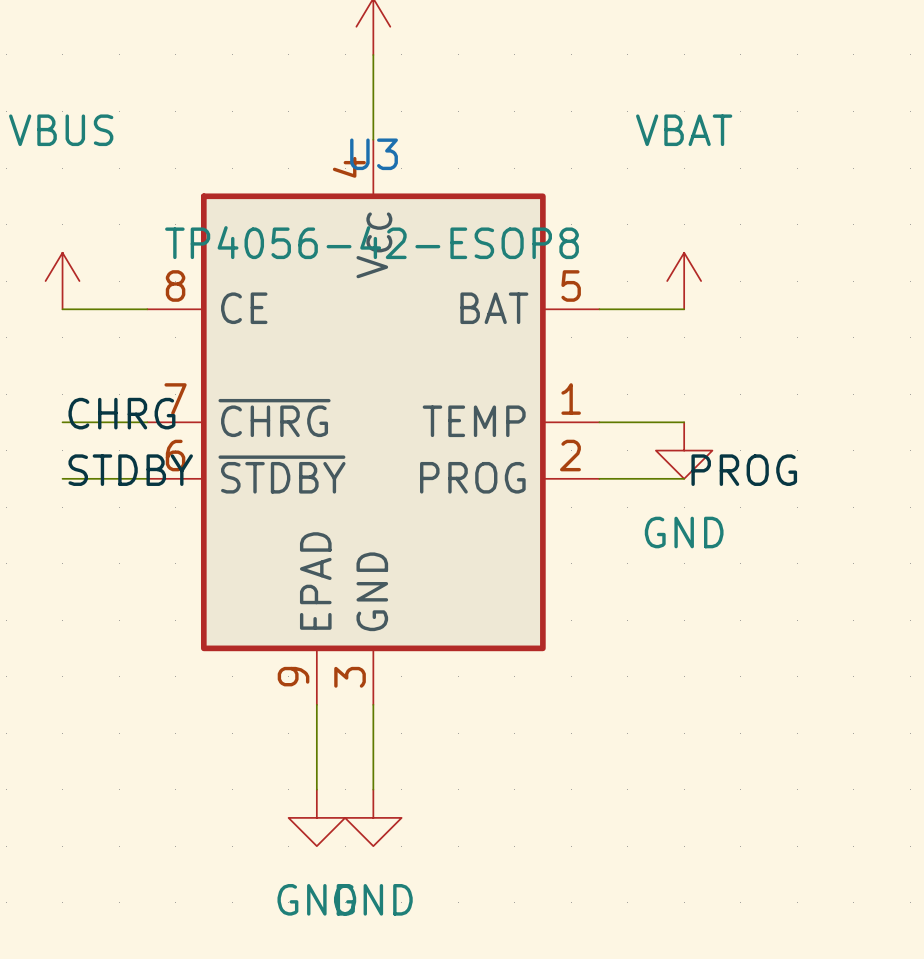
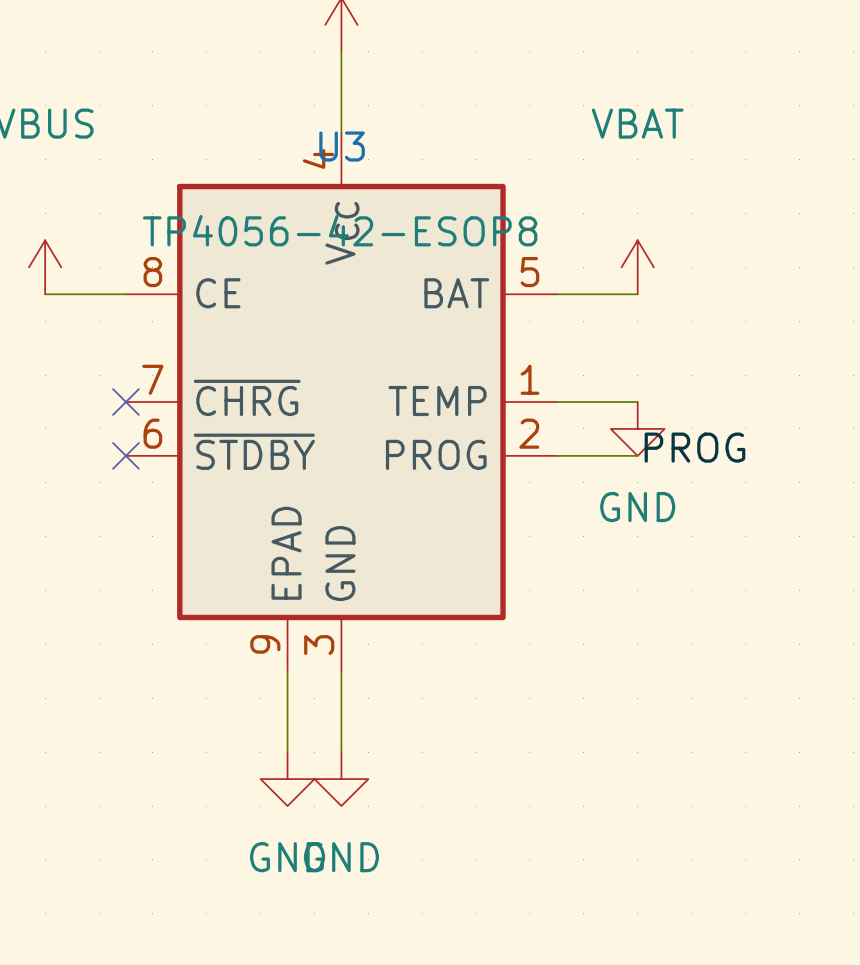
label: CHRG (121, 413) -> none
wire: (62, 422) (147, 422) -> none
no-connect mark: none -> (125, 402)
label: STDBY (130, 470) -> none
wire: (62, 478) (147, 478) -> none
no-connect mark: none -> (125, 455)

